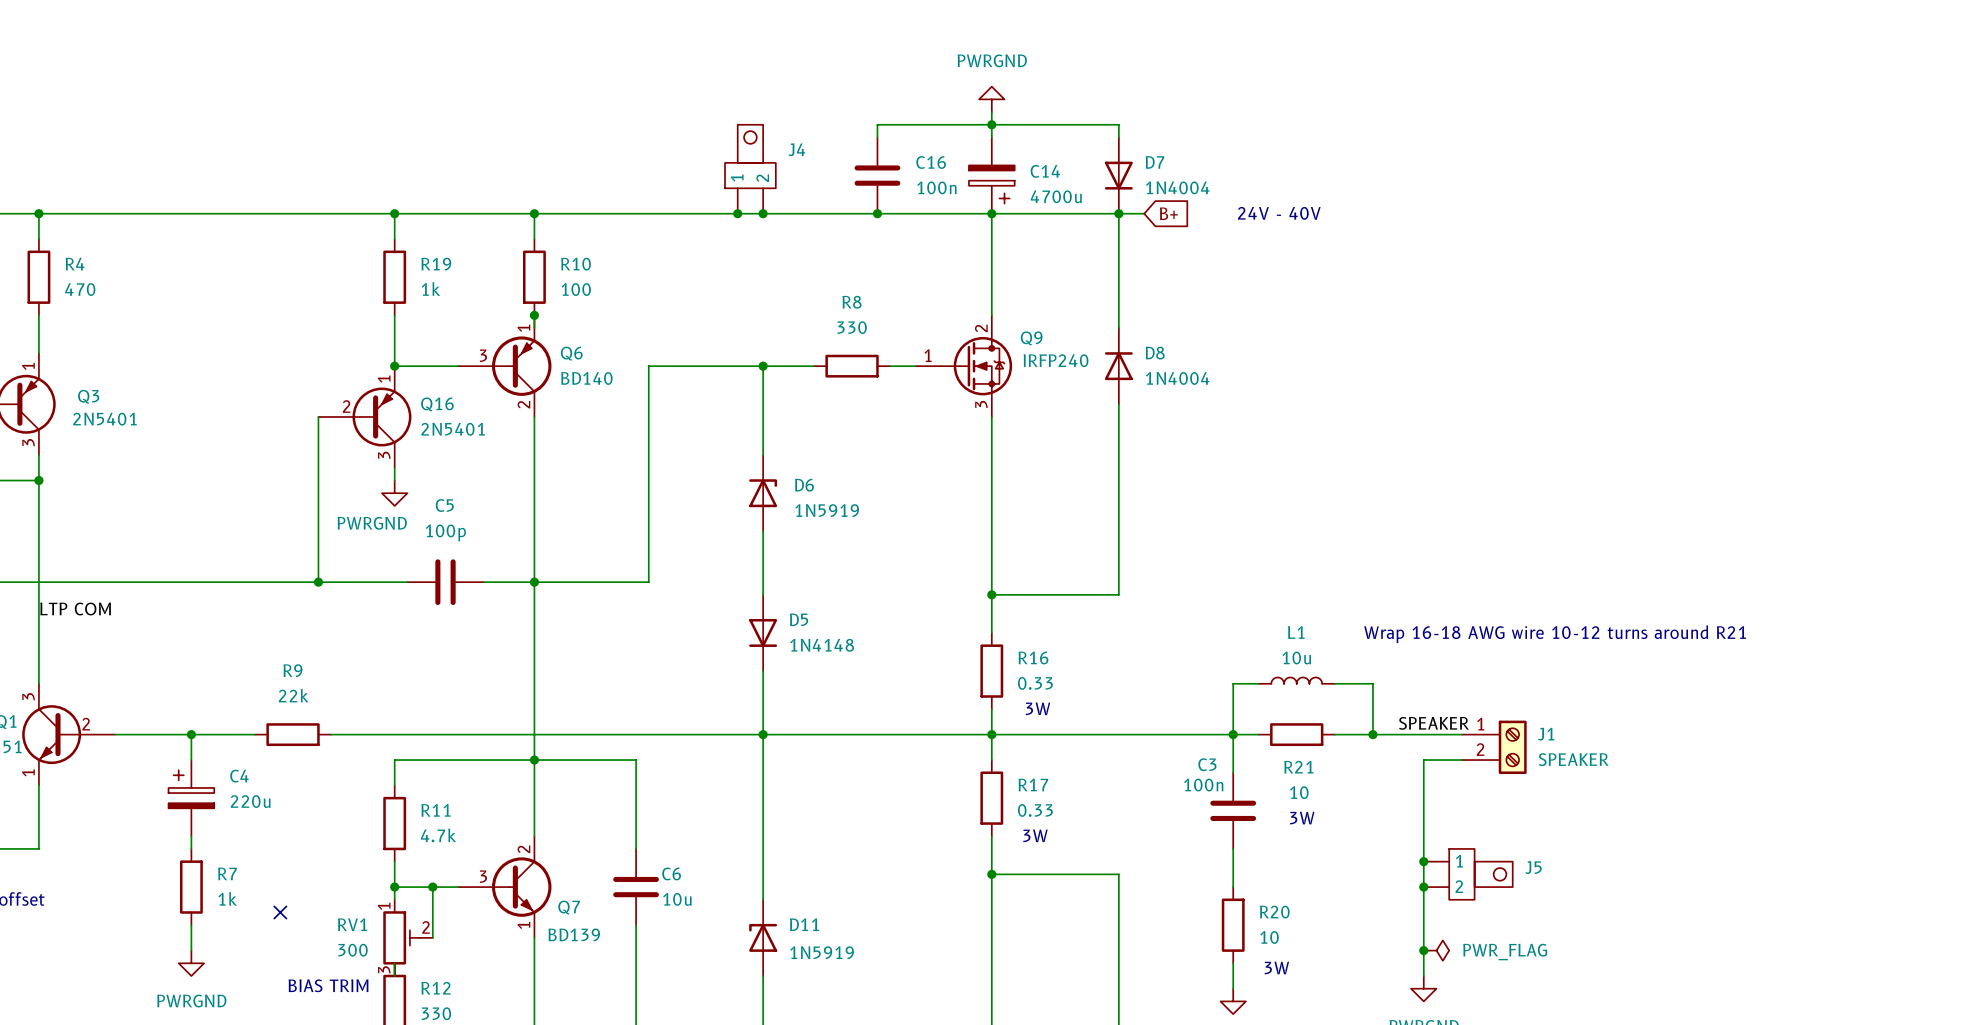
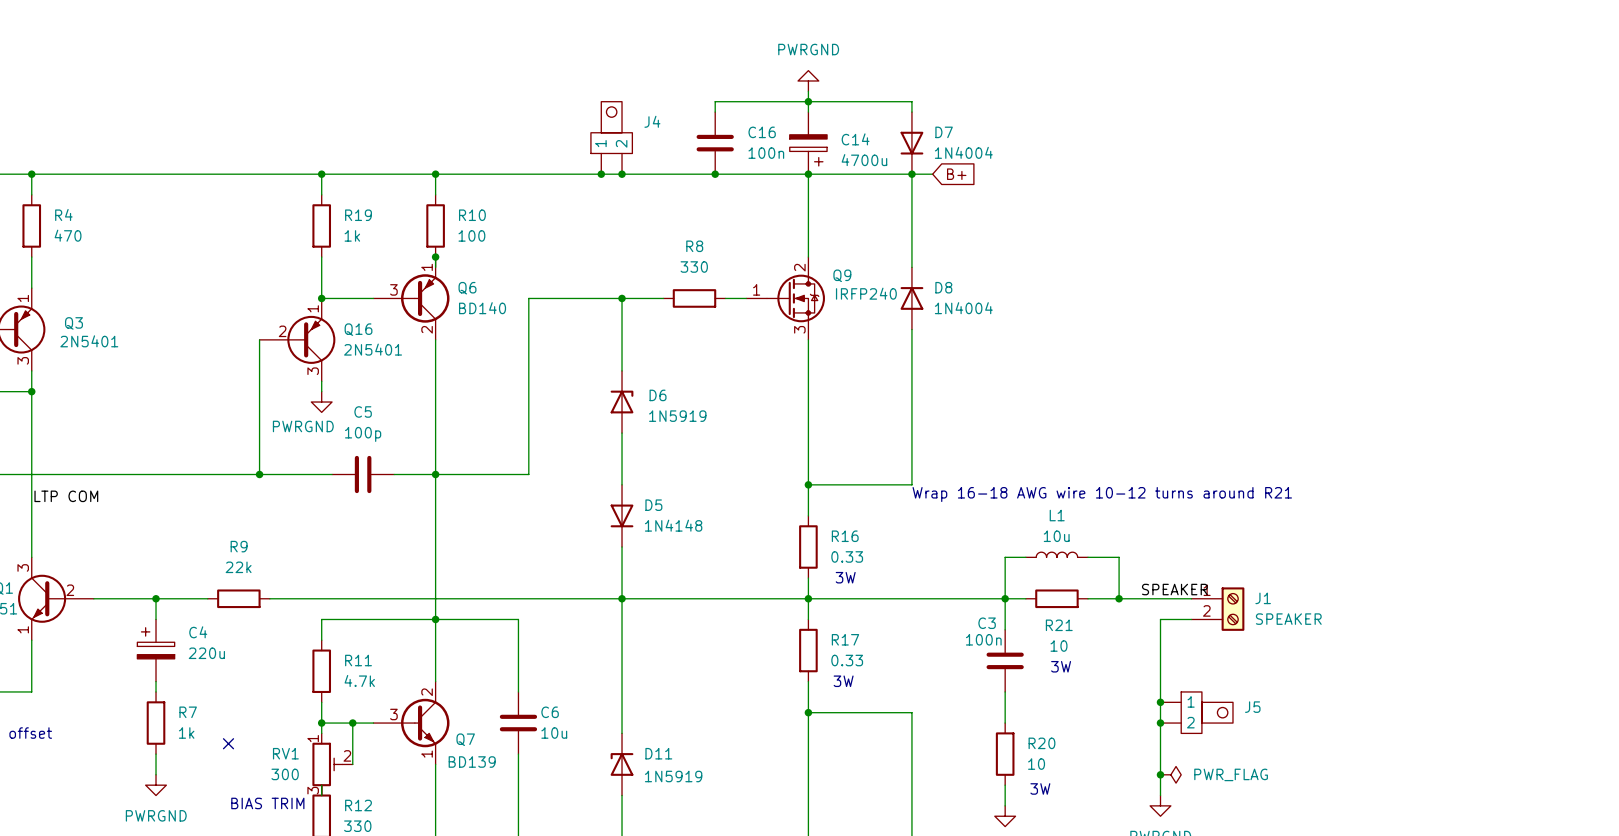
text: 24V - 40V (1279, 213) -> none
text position: Wrap 16-18 AWG wire 10-12 turns around R21 (1555, 634) -> Wrap 16-18 AWG wire 10-12 turns around R21 (1102, 494)

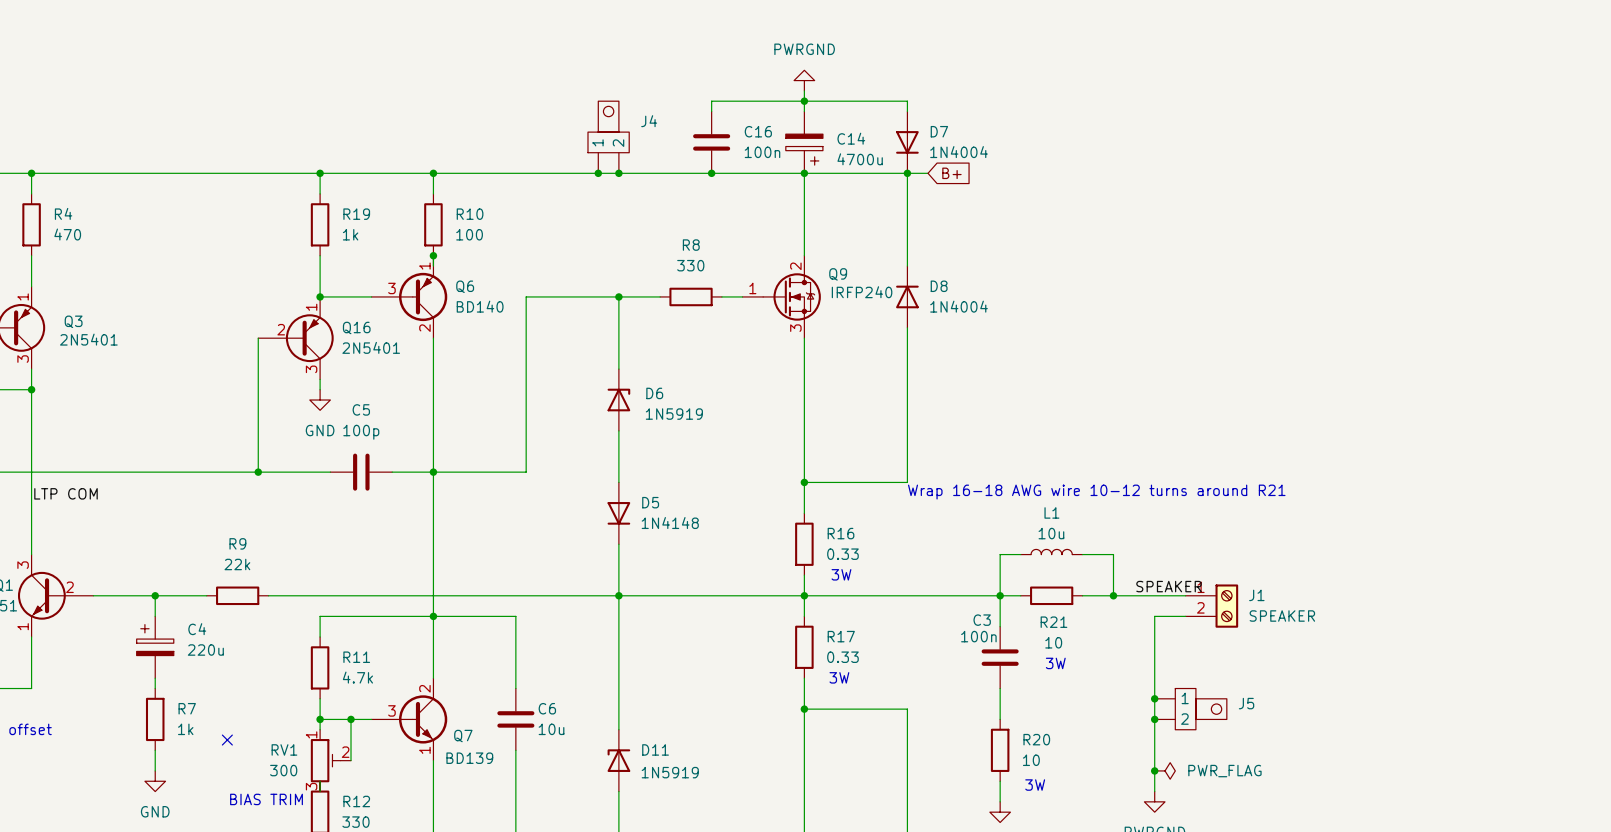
power symbol: PWRGND (321, 402) -> GND (320, 400)
power symbol: PWRGND (156, 785) -> GND (155, 781)

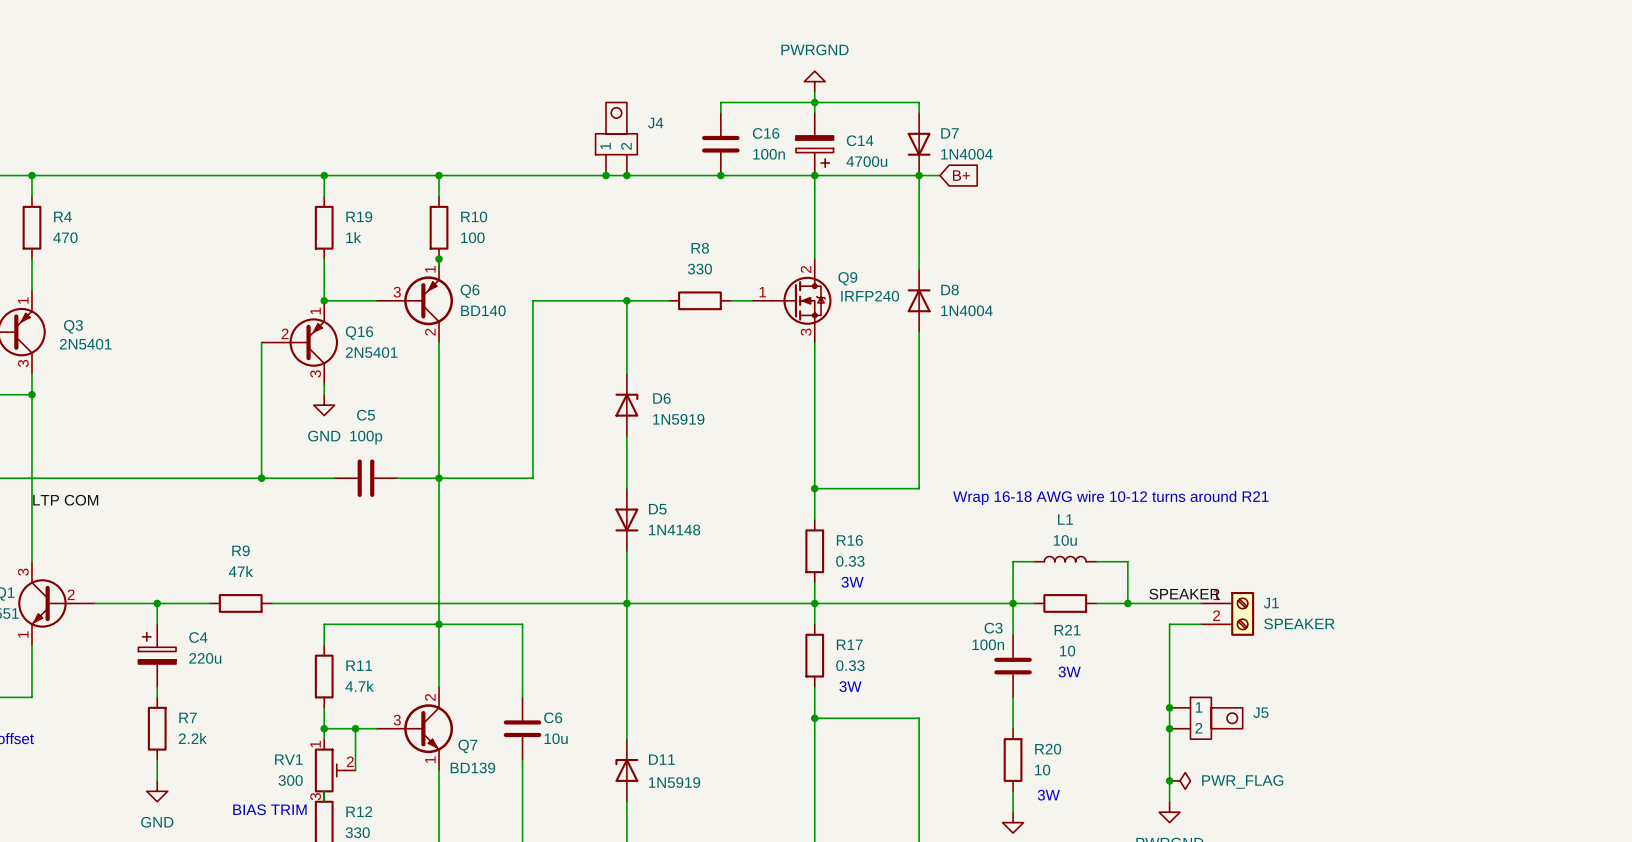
R9 value: 22k (237, 564) -> 47k (240, 571)
R7 value: 1k (185, 729) -> 2.2k (192, 738)
no-connect mark: (227, 740) -> none

